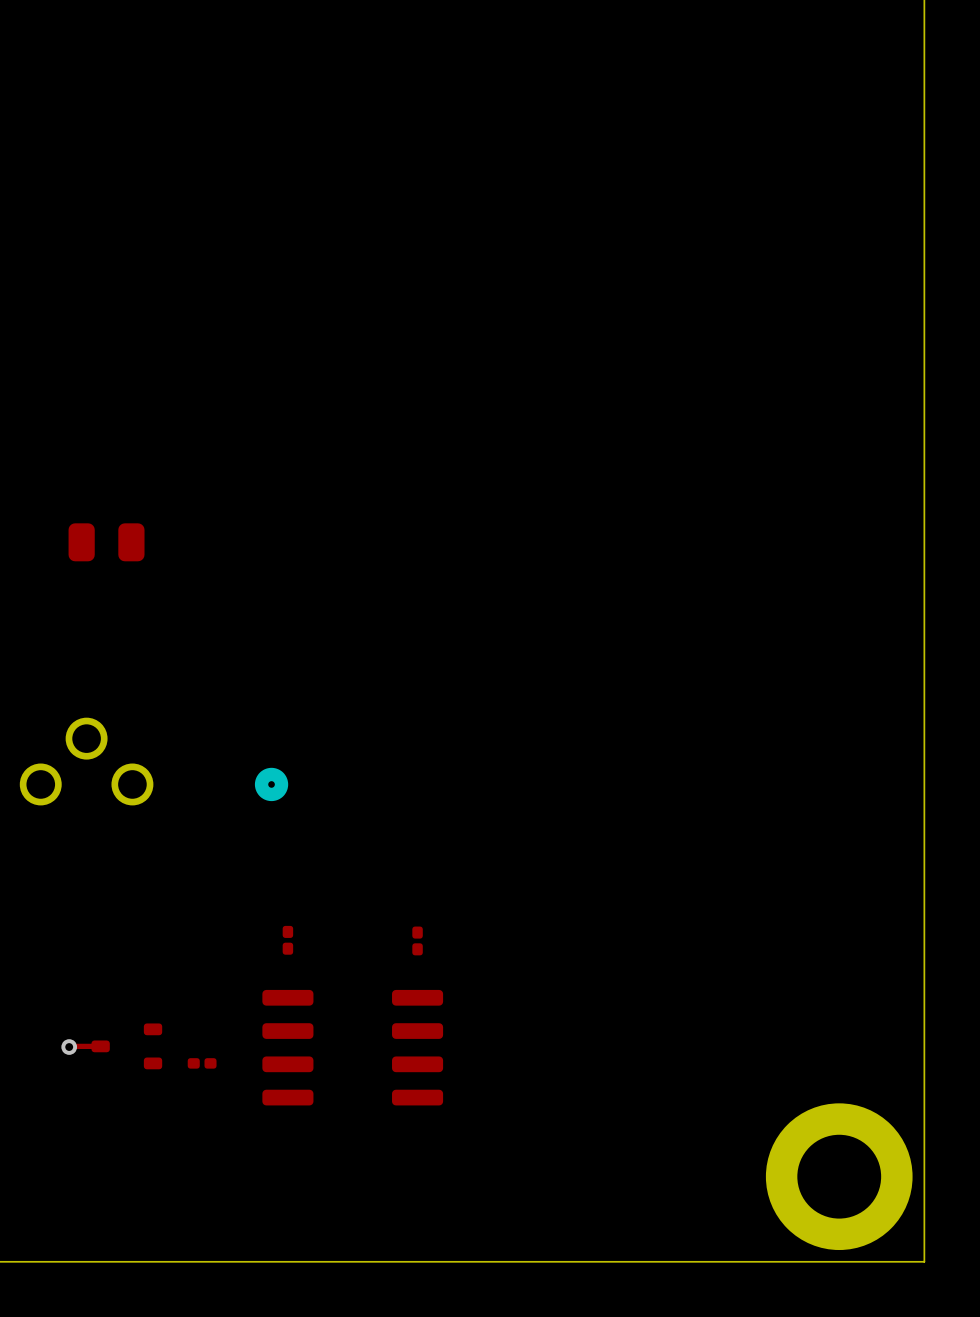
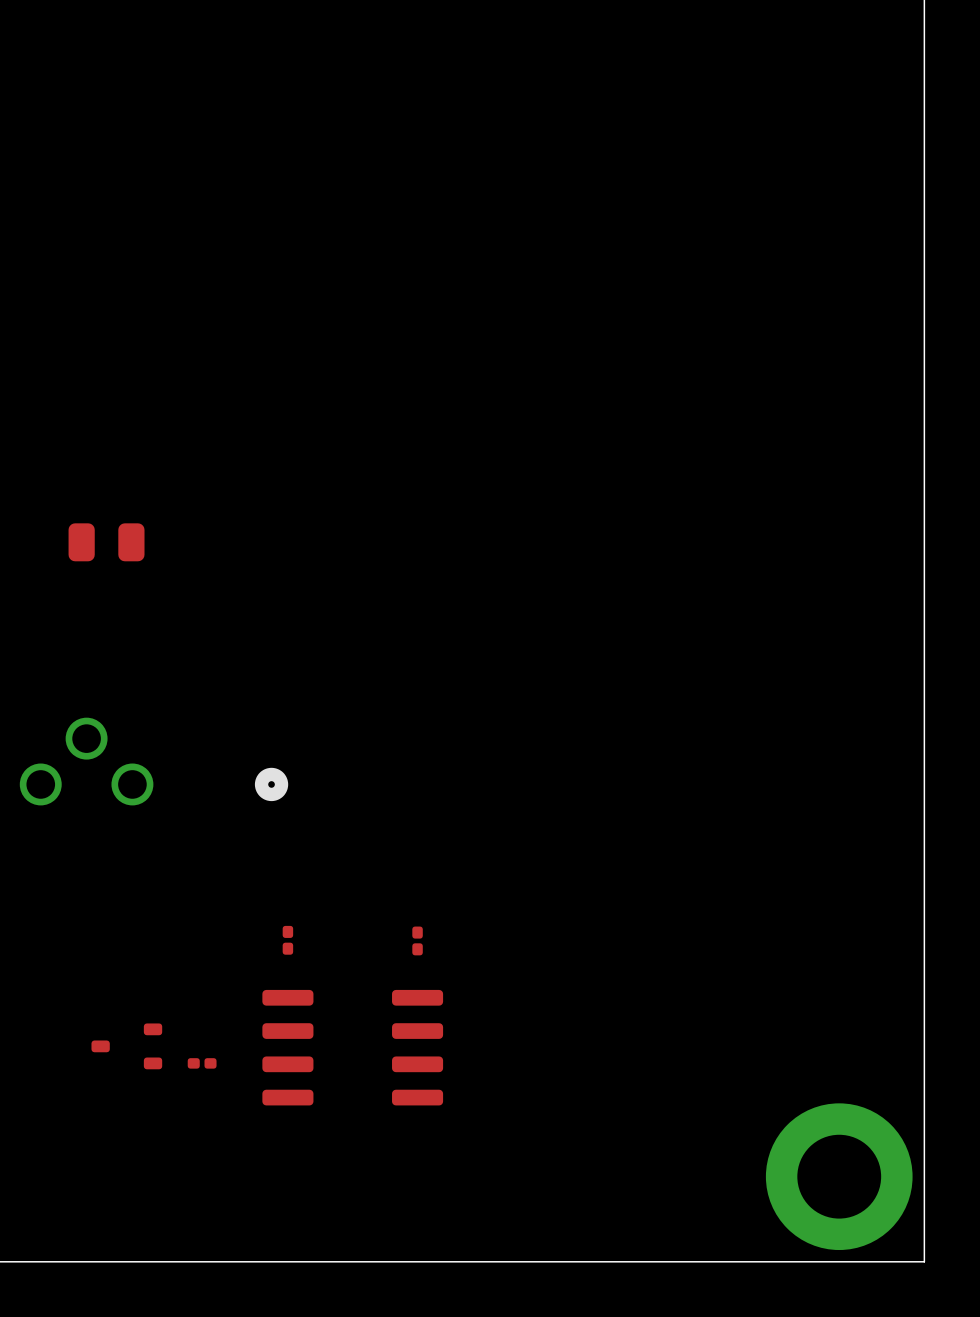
top track: (100, 1046) (69, 1047) -> none
via: (69, 1047) -> none

